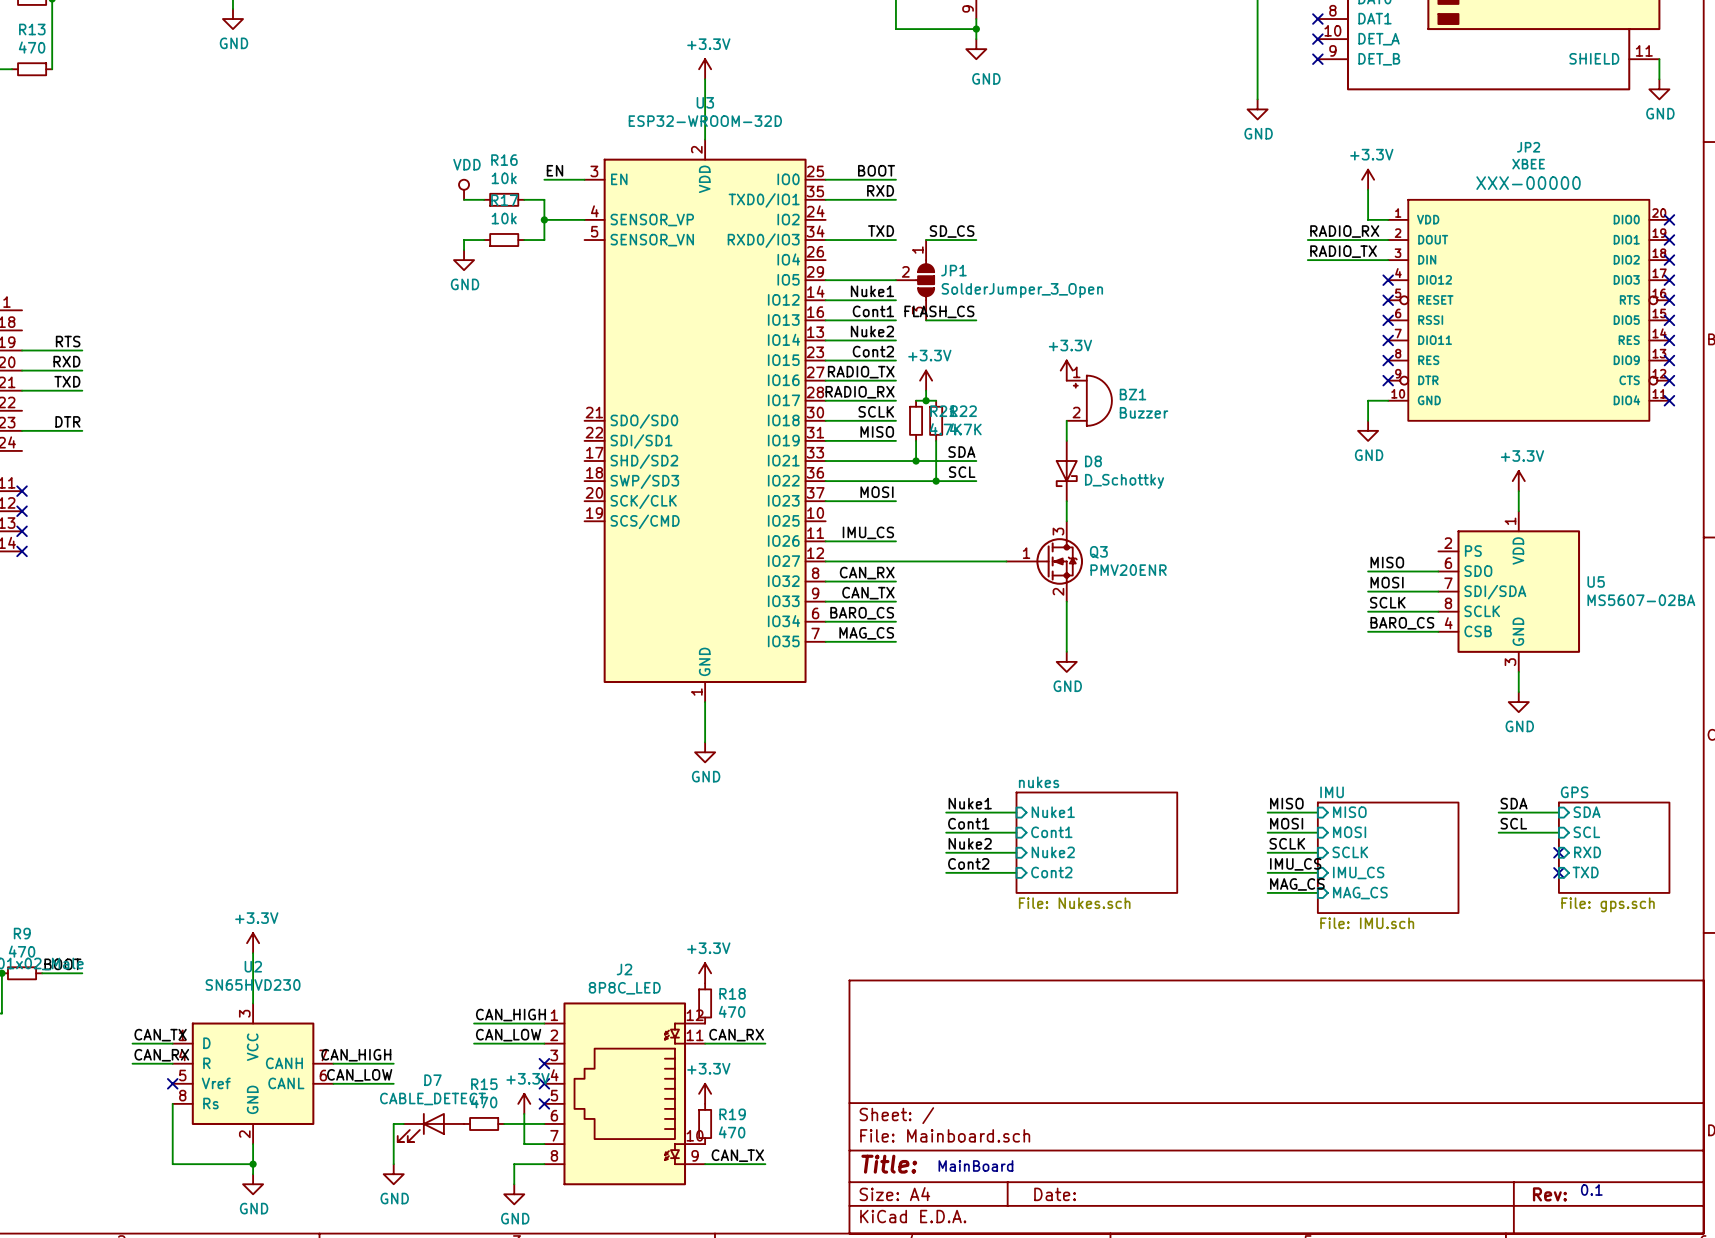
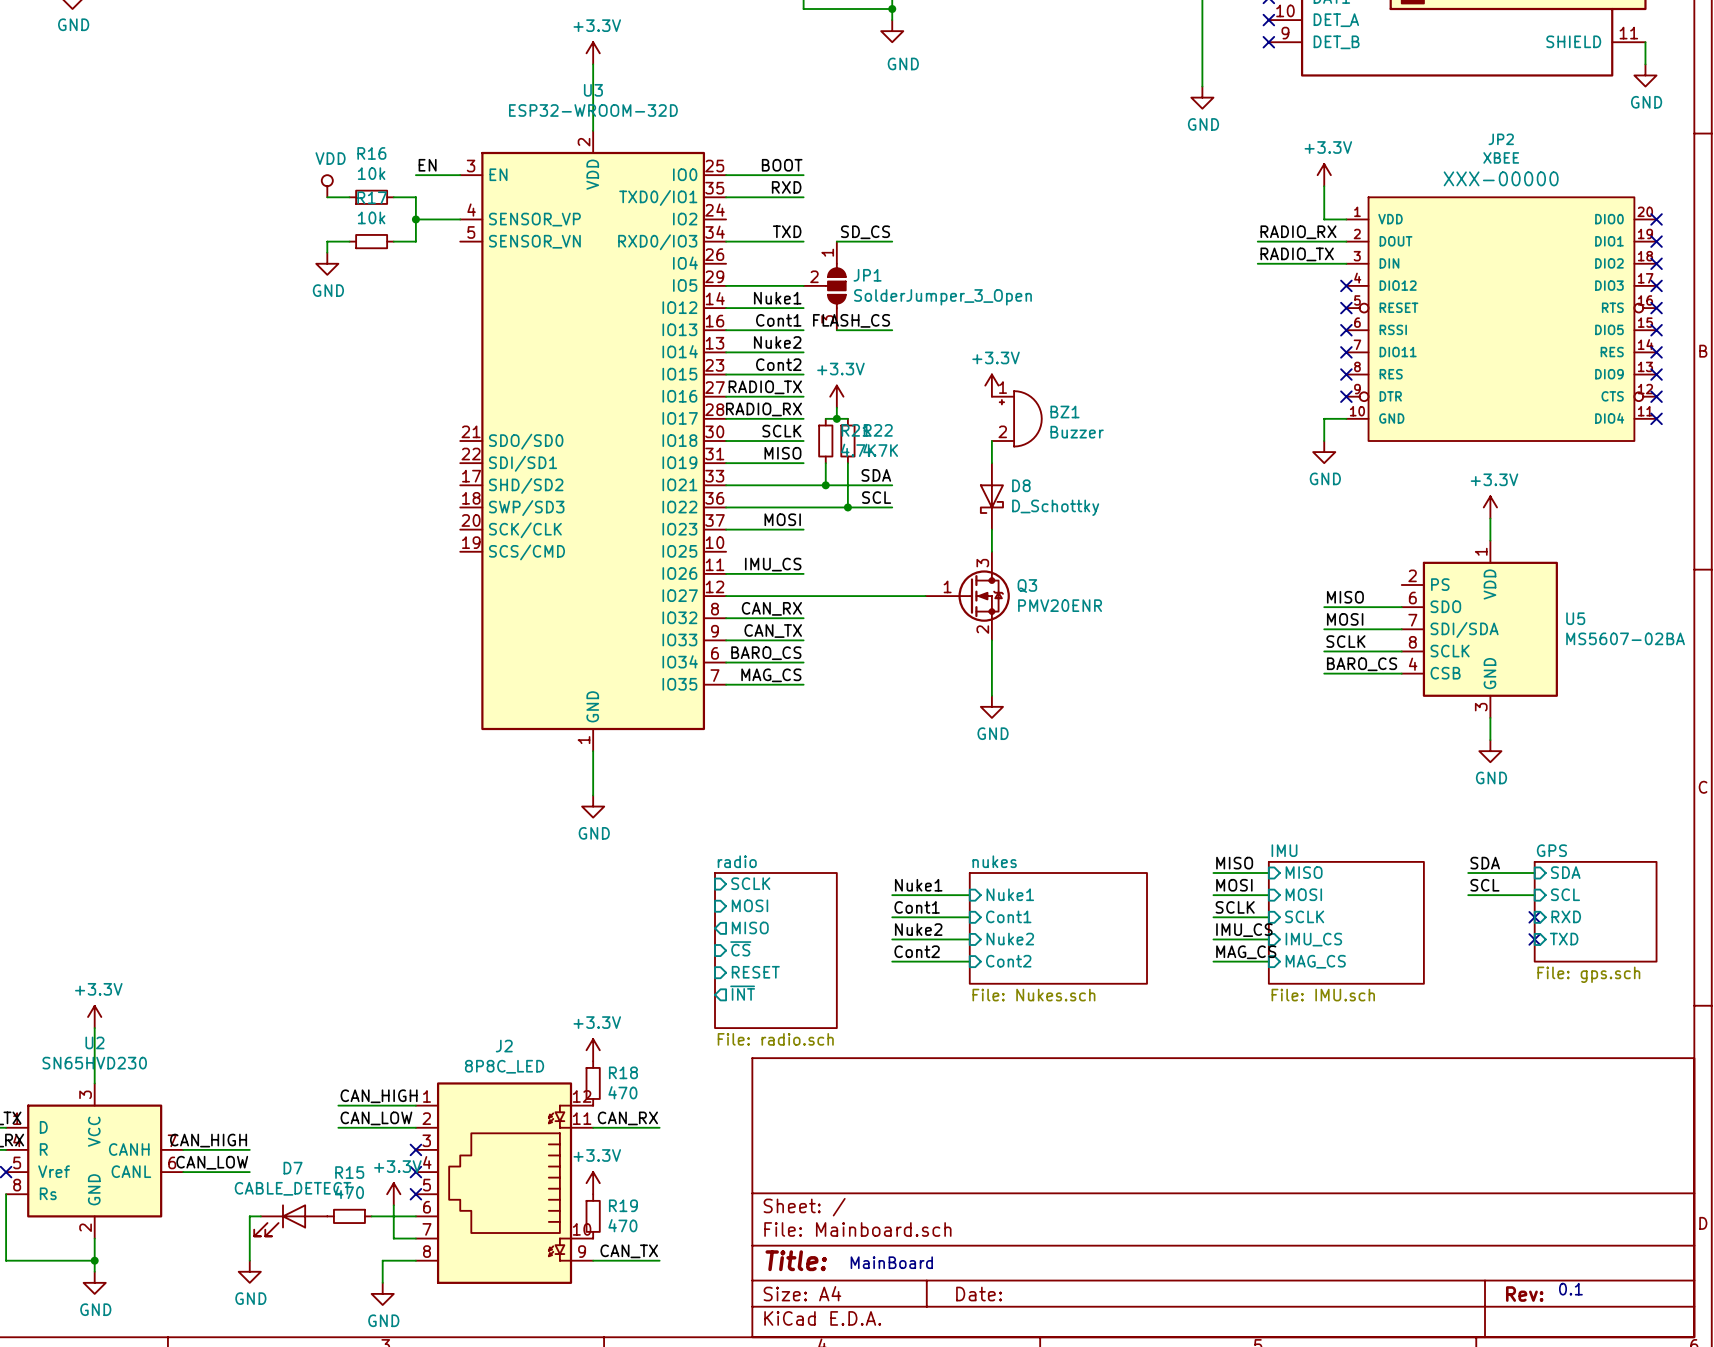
label position: Nuke1 (970, 803) -> Nuke1 (918, 885)
wire: (946, 812) (1016, 812) -> (892, 961) (969, 961)
sheet pin position: Nuke1 (1053, 812) -> Nuke1 (1010, 894)
sheet pin: none -> SCLK (750, 883)
label position: Cont1 (968, 823) -> Cont1 (917, 907)
wire: (946, 832) (976, 832) -> (936, 895) (969, 895)
sheet pin position: Cont1 (1051, 832) -> Cont1 (1008, 916)
sheet pin: none -> MOSI (749, 905)
sheet nukes position: (1096, 842) -> (1058, 928)
label position: Nuke2 (970, 843) -> Nuke2 (918, 929)
wire: (946, 852) (976, 852) -> (936, 917) (969, 917)
sheet pin position: Nuke2 (1053, 852) -> Nuke2 (1010, 939)
sheet pin: none -> MISO (750, 927)
label position: Cont2 (968, 863) -> Cont2 (917, 951)
wire: (946, 872) (976, 872) -> (936, 939) (969, 939)
sheet pin position: Cont2 (1051, 872) -> Cont2 (1008, 961)
sheet pin: none -> ~{CS} (740, 948)
sheet radio: none -> File: radio.sch (775, 950)
sheet pin: none -> RESET (755, 972)
sheet pin: none -> ~{INT} (742, 993)

